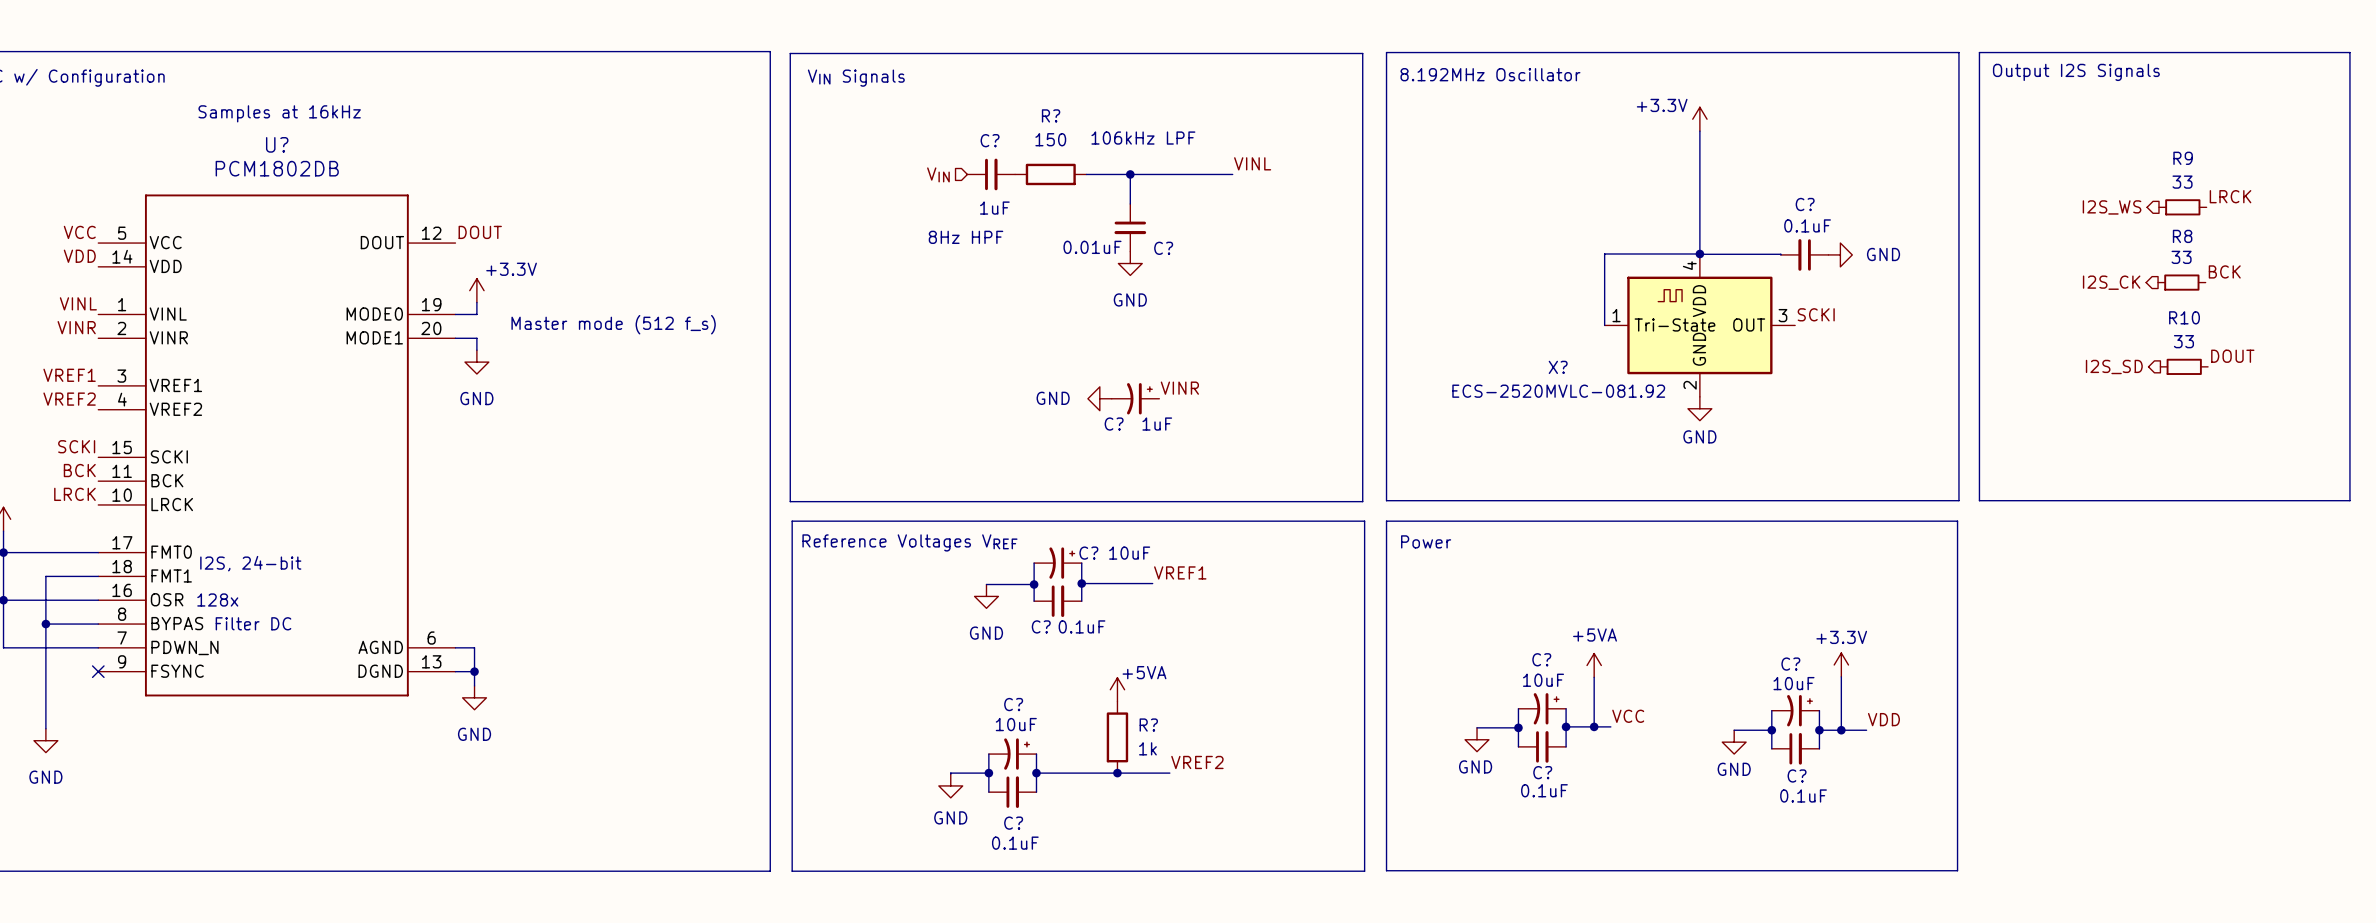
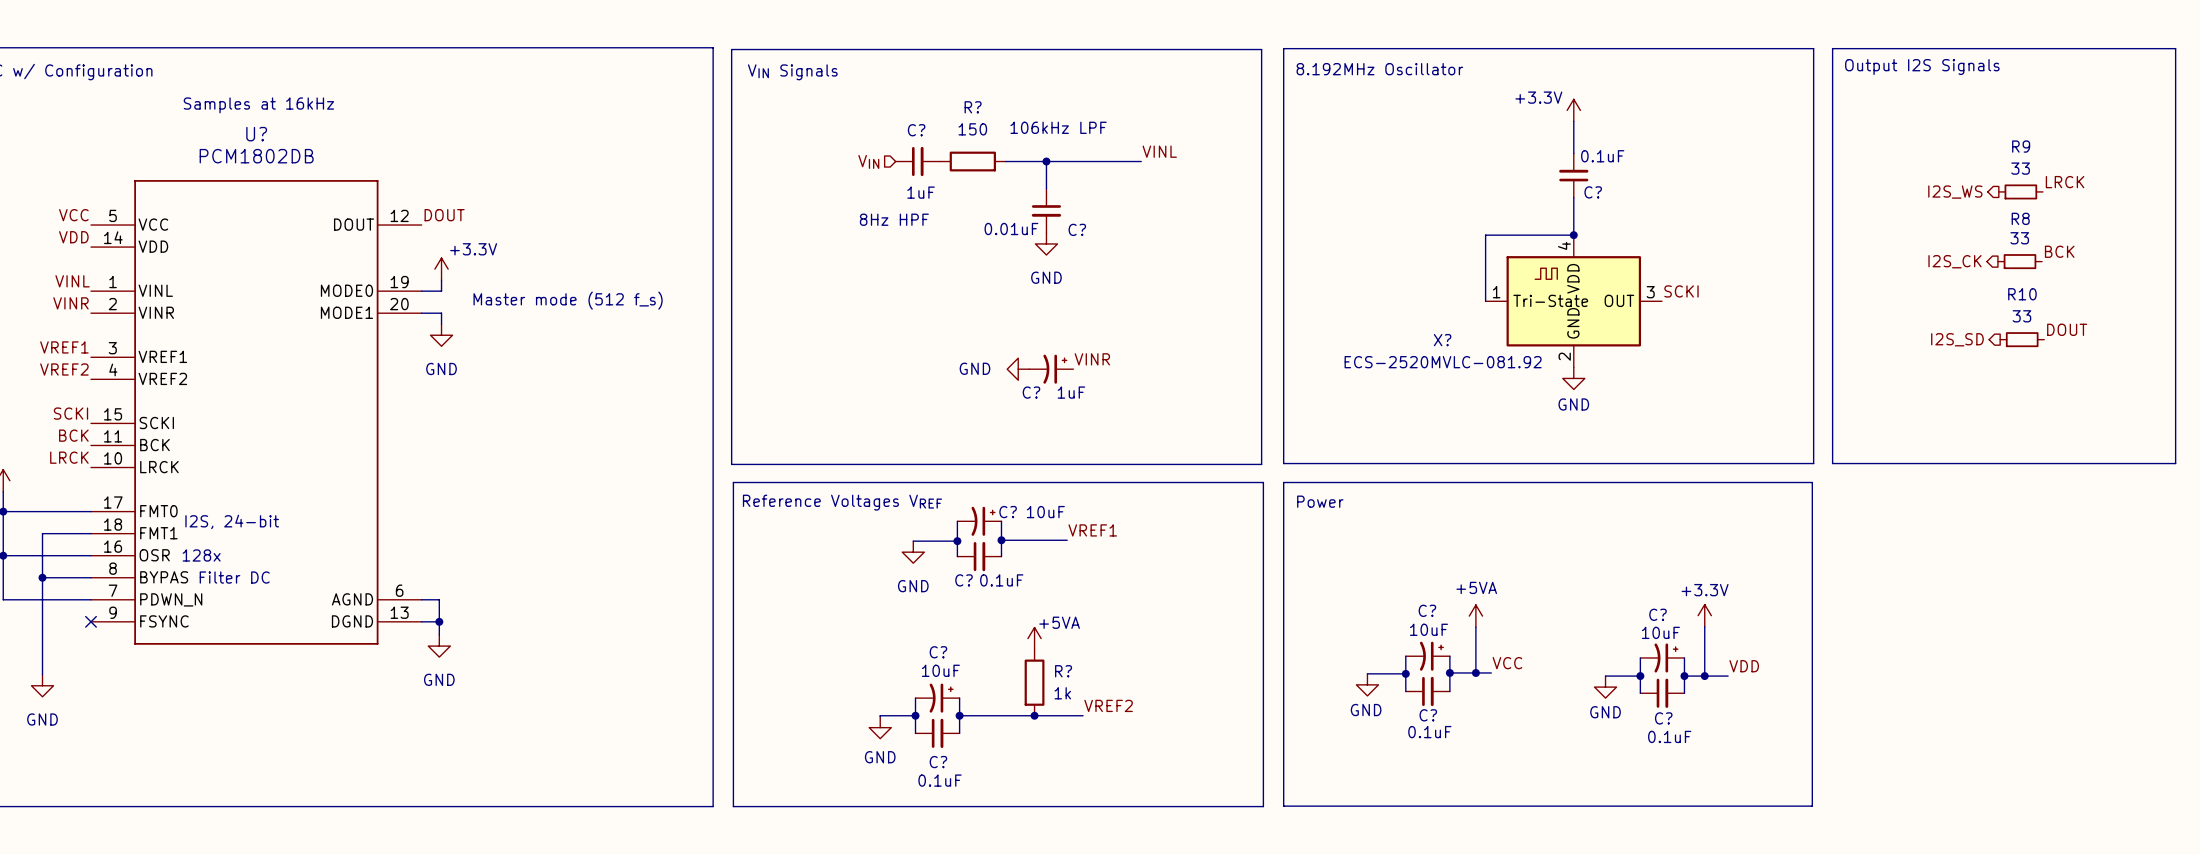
C? name position: C? (1805, 204) -> C? (1593, 192)
C? value position: 0.1uF (1807, 225) -> 0.1uF (1602, 156)
wire: (1699, 253) (1780, 254) -> none
C? rotation: 0° (1804, 254) -> 90° clockwise (1573, 175)
C? position: (1804, 254) -> (1573, 175)
power symbol: GND (1840, 254) -> none

